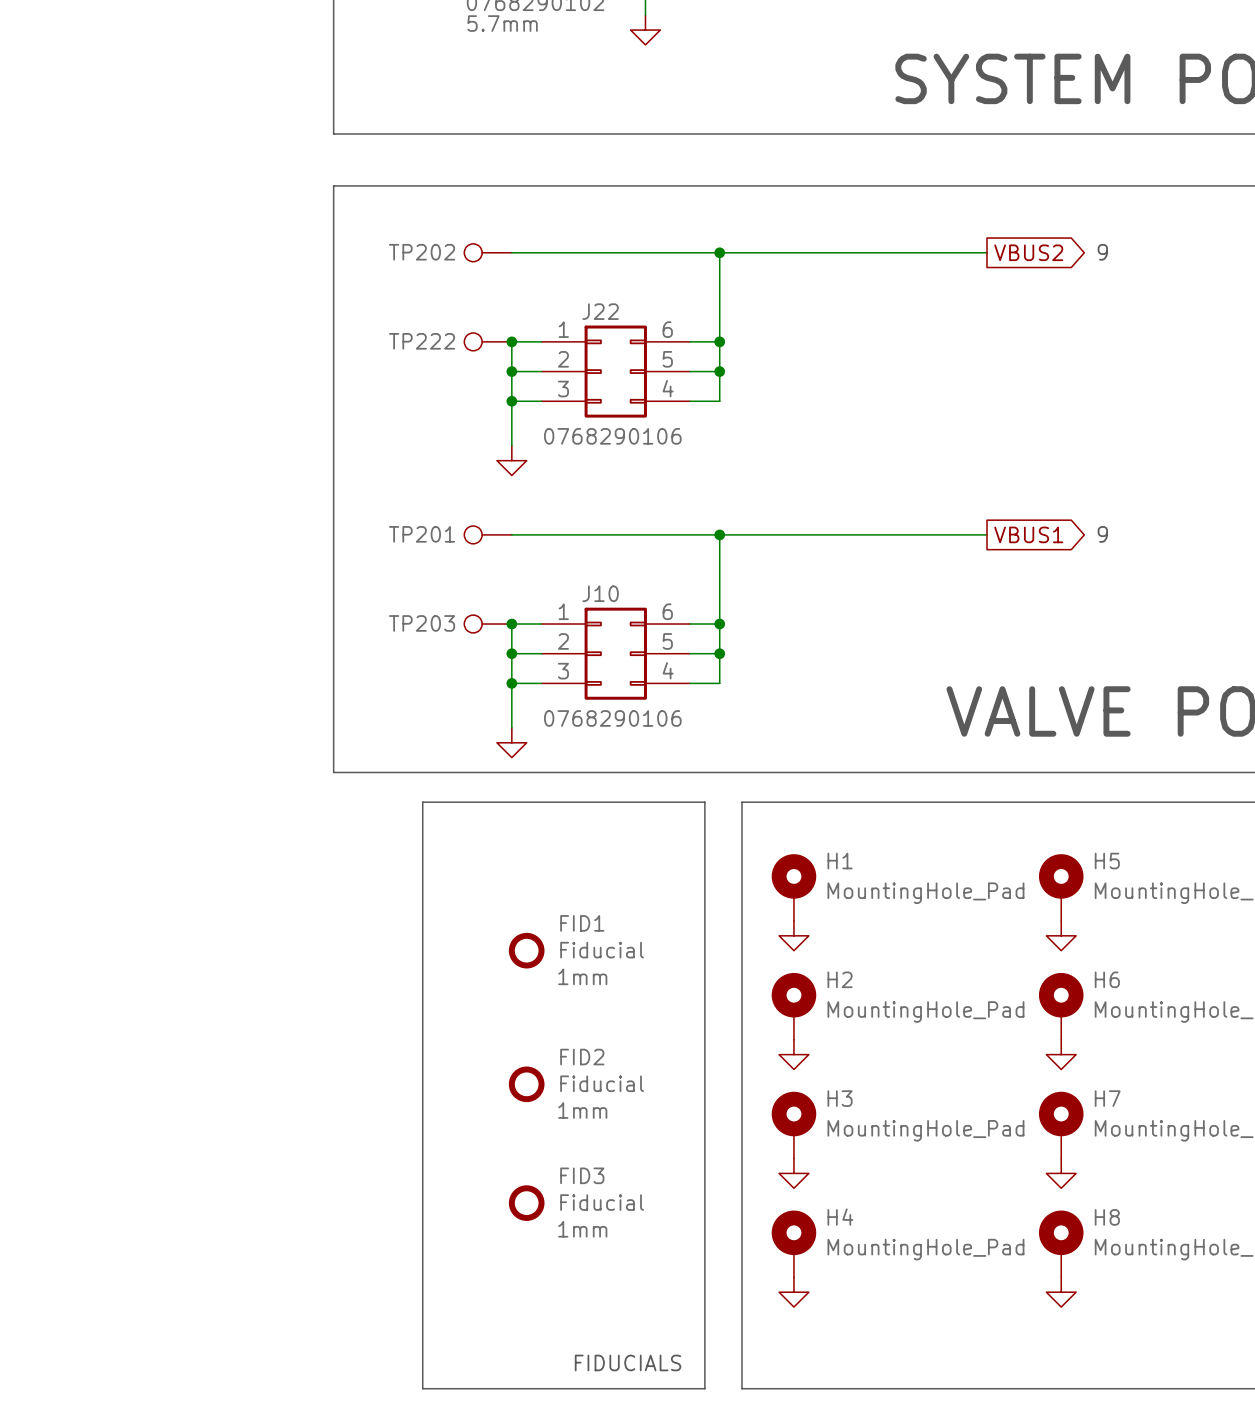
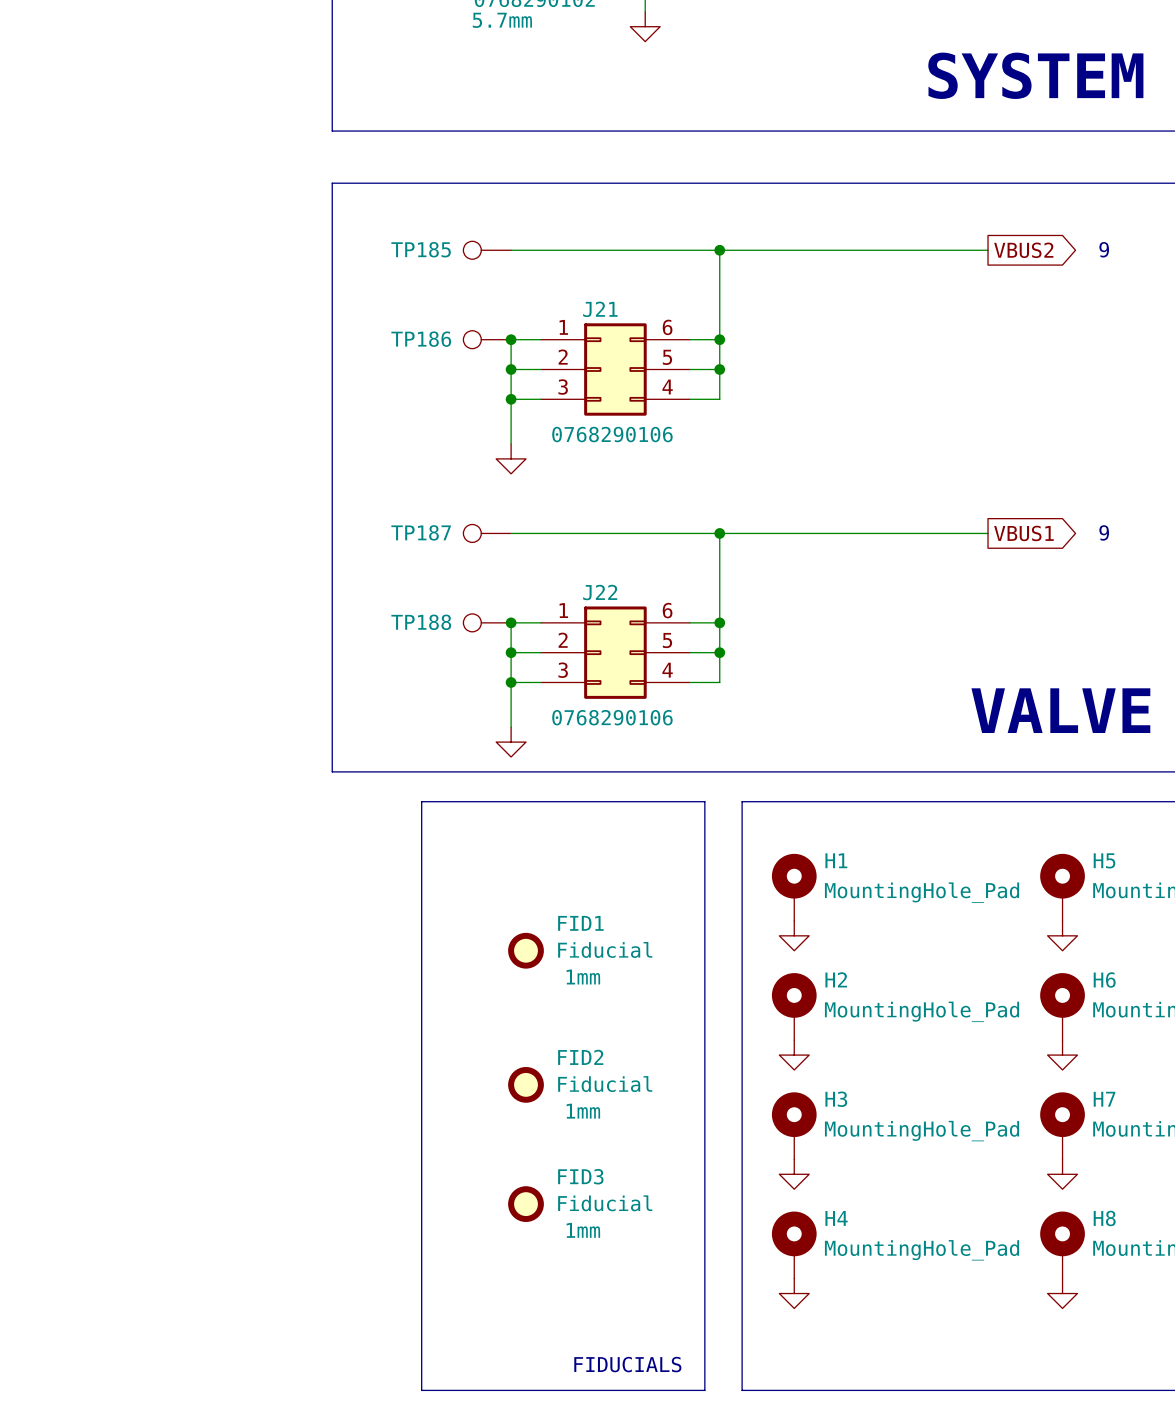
TP202 name: TP202 (422, 252) -> TP185 (421, 249)
J22 name: J22 (600, 311) -> J21 (600, 309)
TP222 name: TP222 (422, 341) -> TP186 (421, 339)
TP201 name: TP201 (422, 534) -> TP187 (421, 532)
J10 name: J10 (600, 593) -> J22 (600, 592)
TP203 name: TP203 (422, 623) -> TP188 (421, 622)

